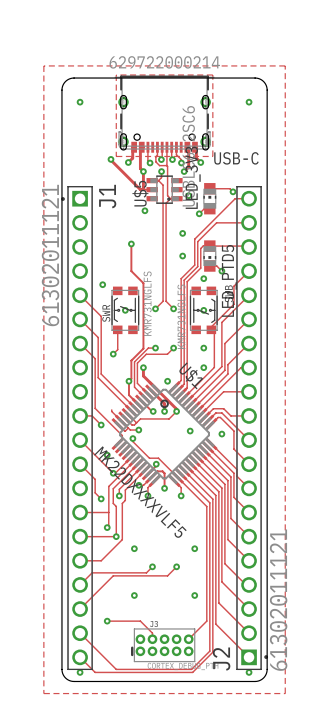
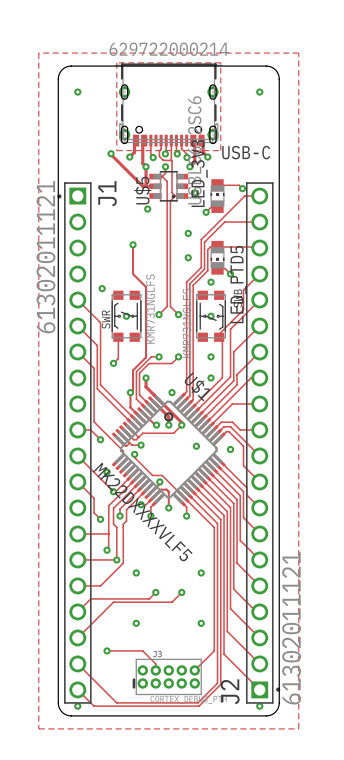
track: (111, 409) (120, 420) -> none

